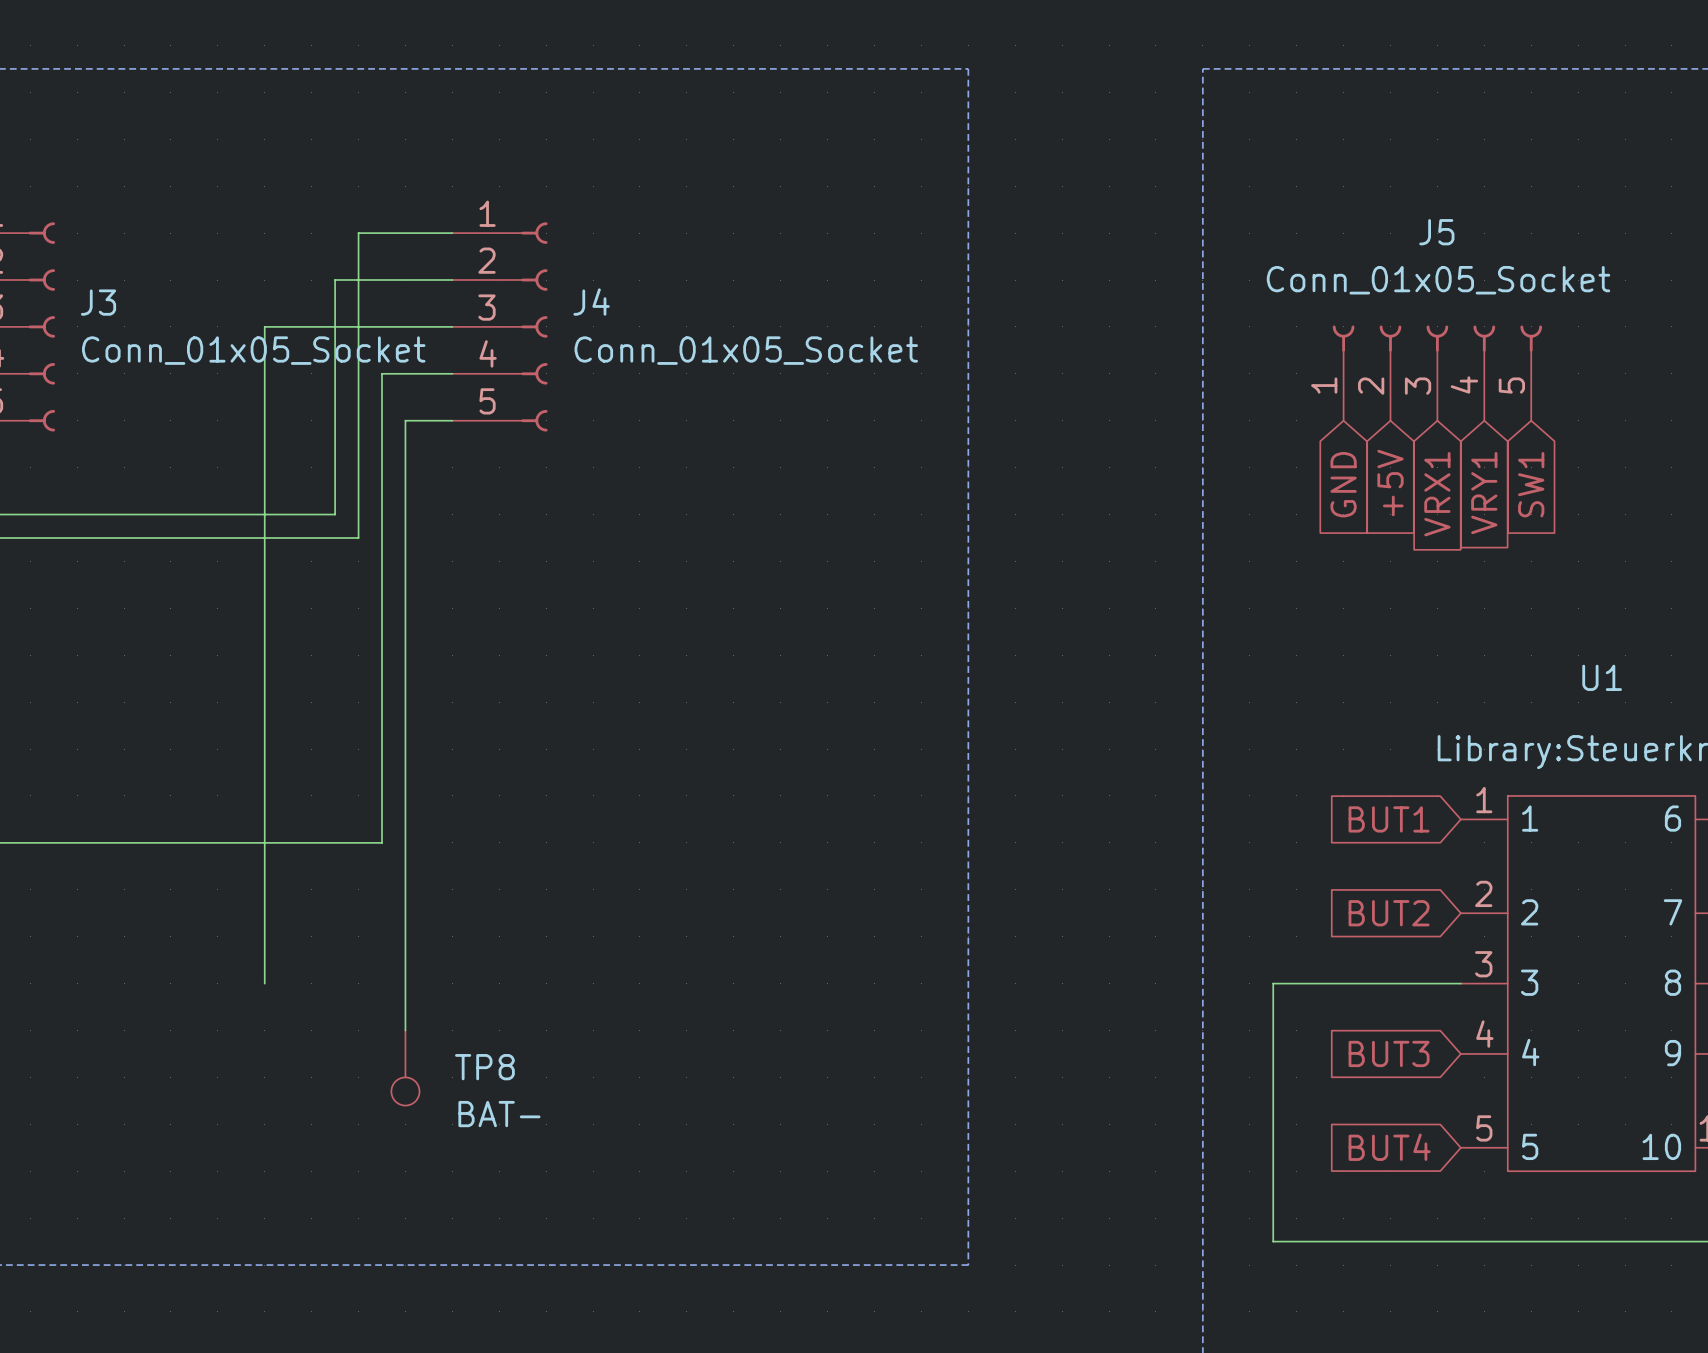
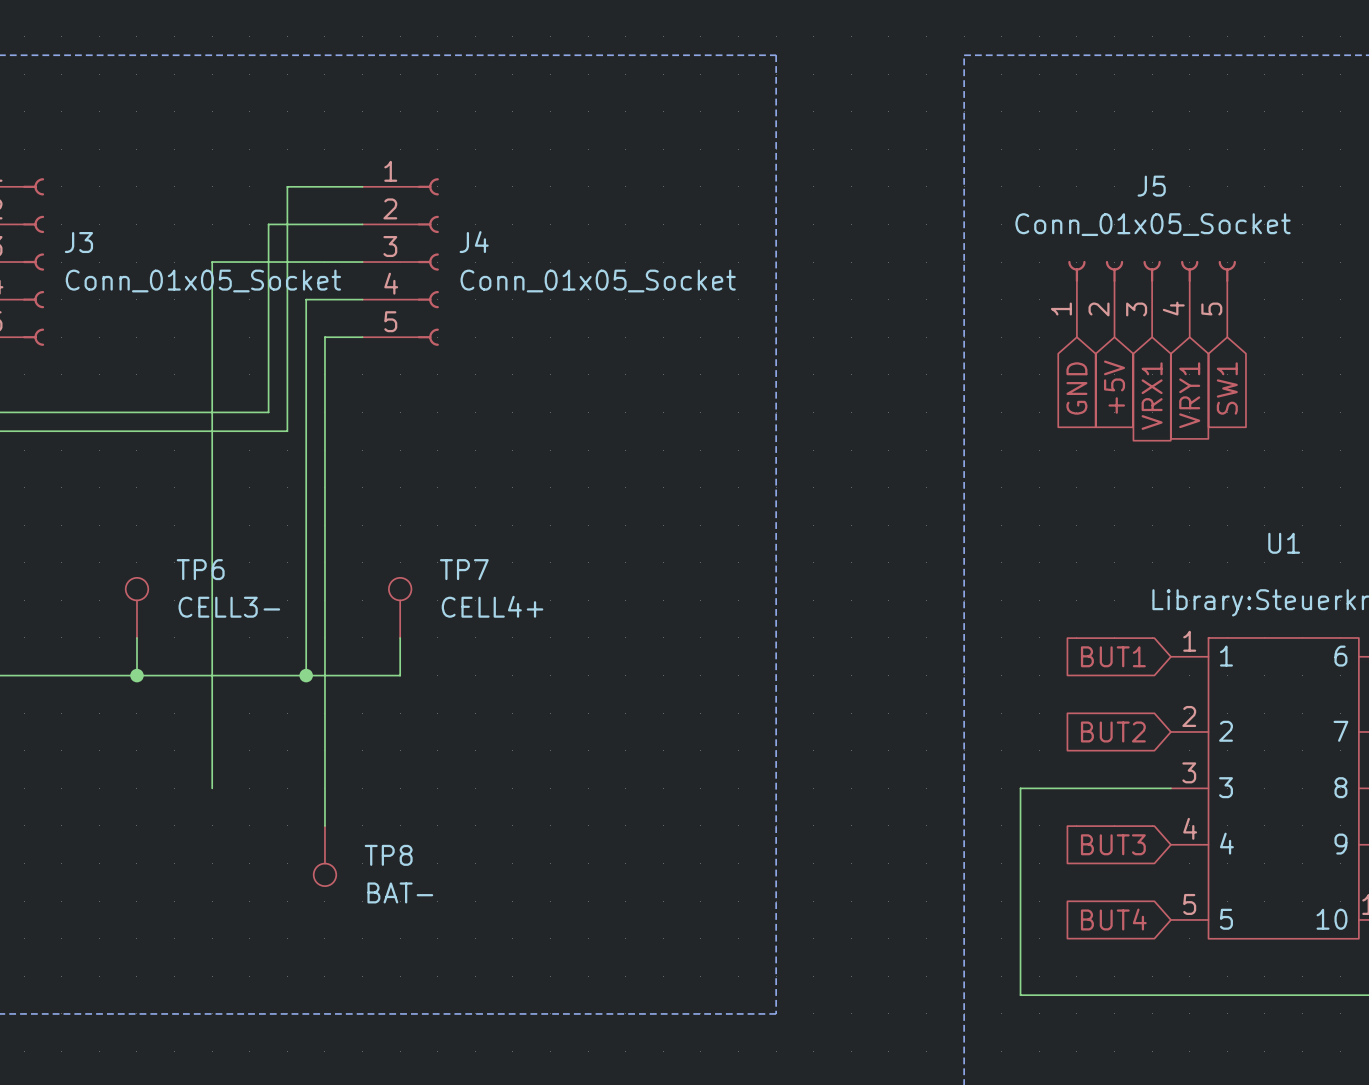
TP6: none -> CELL3- (136, 607)
TP7: none -> CELL4+ (400, 607)
wire: none -> (136, 637) (136, 675)
wire: none -> (400, 637) (400, 675) (306, 675)
junction: none -> (136, 675)
junction: none -> (306, 675)

